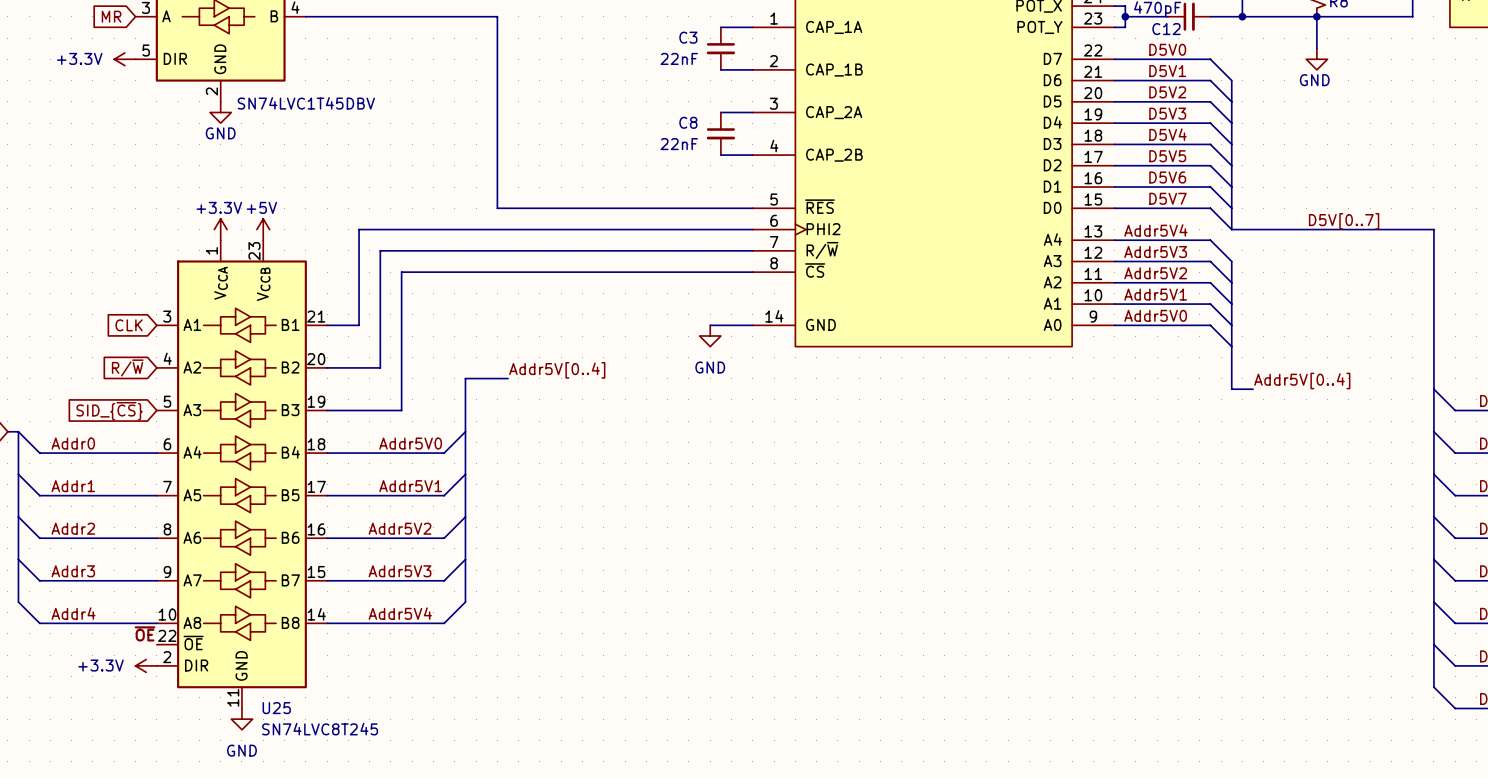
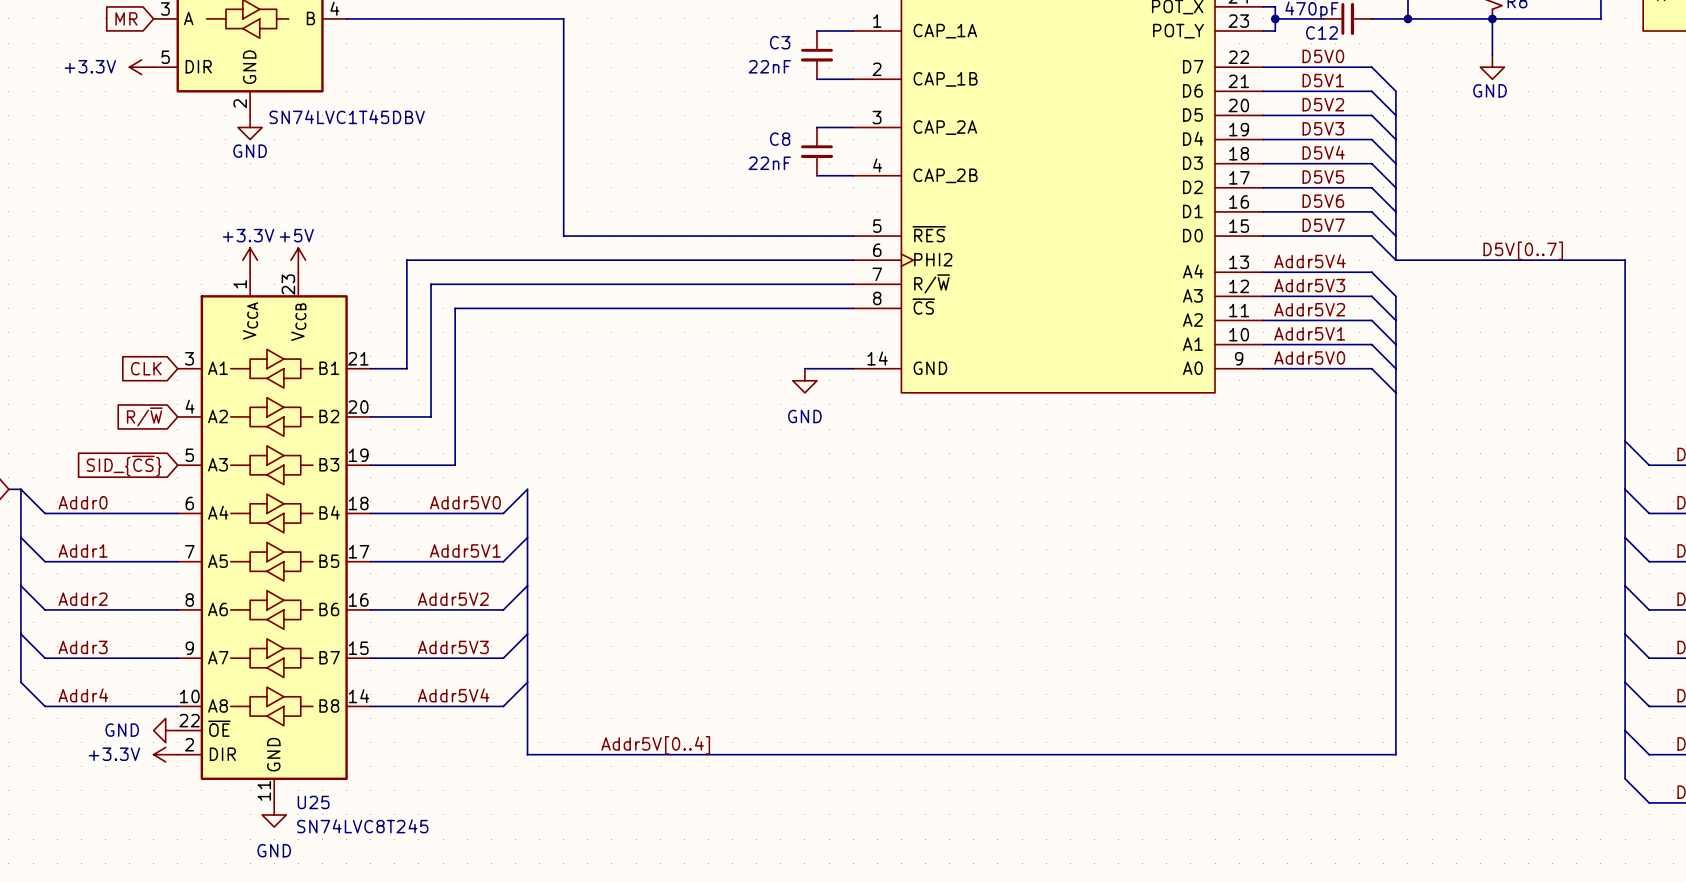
label: Addr5V[0..4] (557, 370) -> none
bus: (508, 378) (465, 378) (465, 431) -> none
label: Addr5V[0..4] (1302, 380) -> none
bus: (1231, 389) (1253, 389) -> (1395, 441) (1395, 754) (527, 754) (527, 682)
label: ~{OE} (145, 633) -> none
power symbol: none -> GND (165, 730)
label: none -> Addr5V[0..4] (655, 745)

